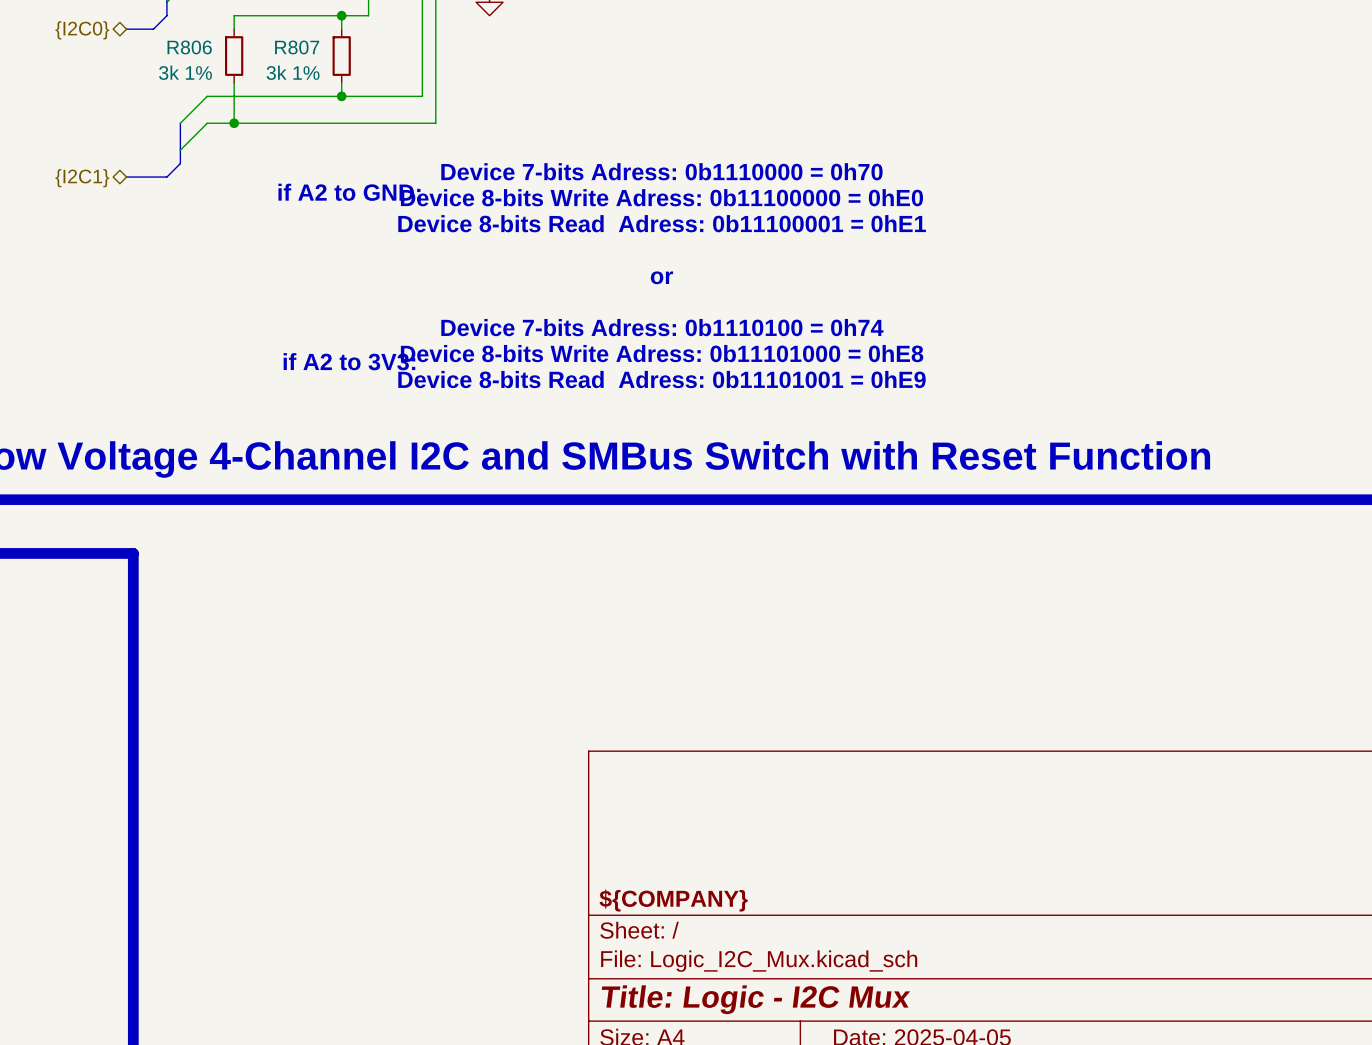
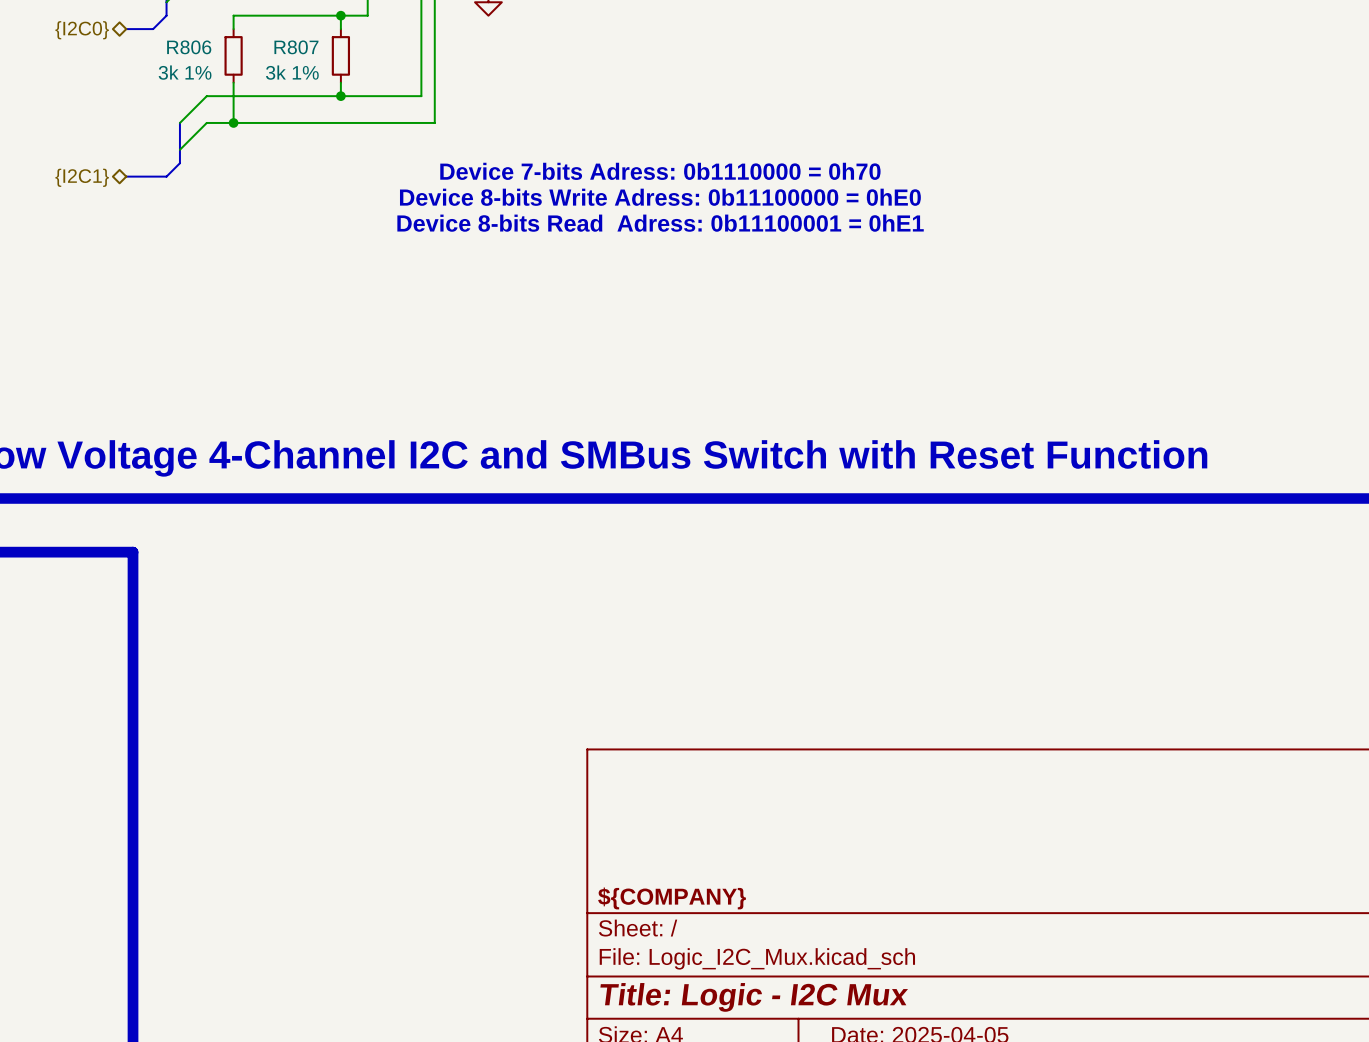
text: if A2 to GND: (349, 192) -> none
text: or (661, 277) -> none
text: Device 7-bits Adress: 0b1110100 = 0h74 (662, 327) -> none
text: Device 8-bits Write Adress: 0b11101000 = 0hE8 (662, 353) -> none
text: if A2 to 3V3: (349, 361) -> none
text: Device 8-bits Read Adress: 0b11101001 = 0hE9 (662, 379) -> none

